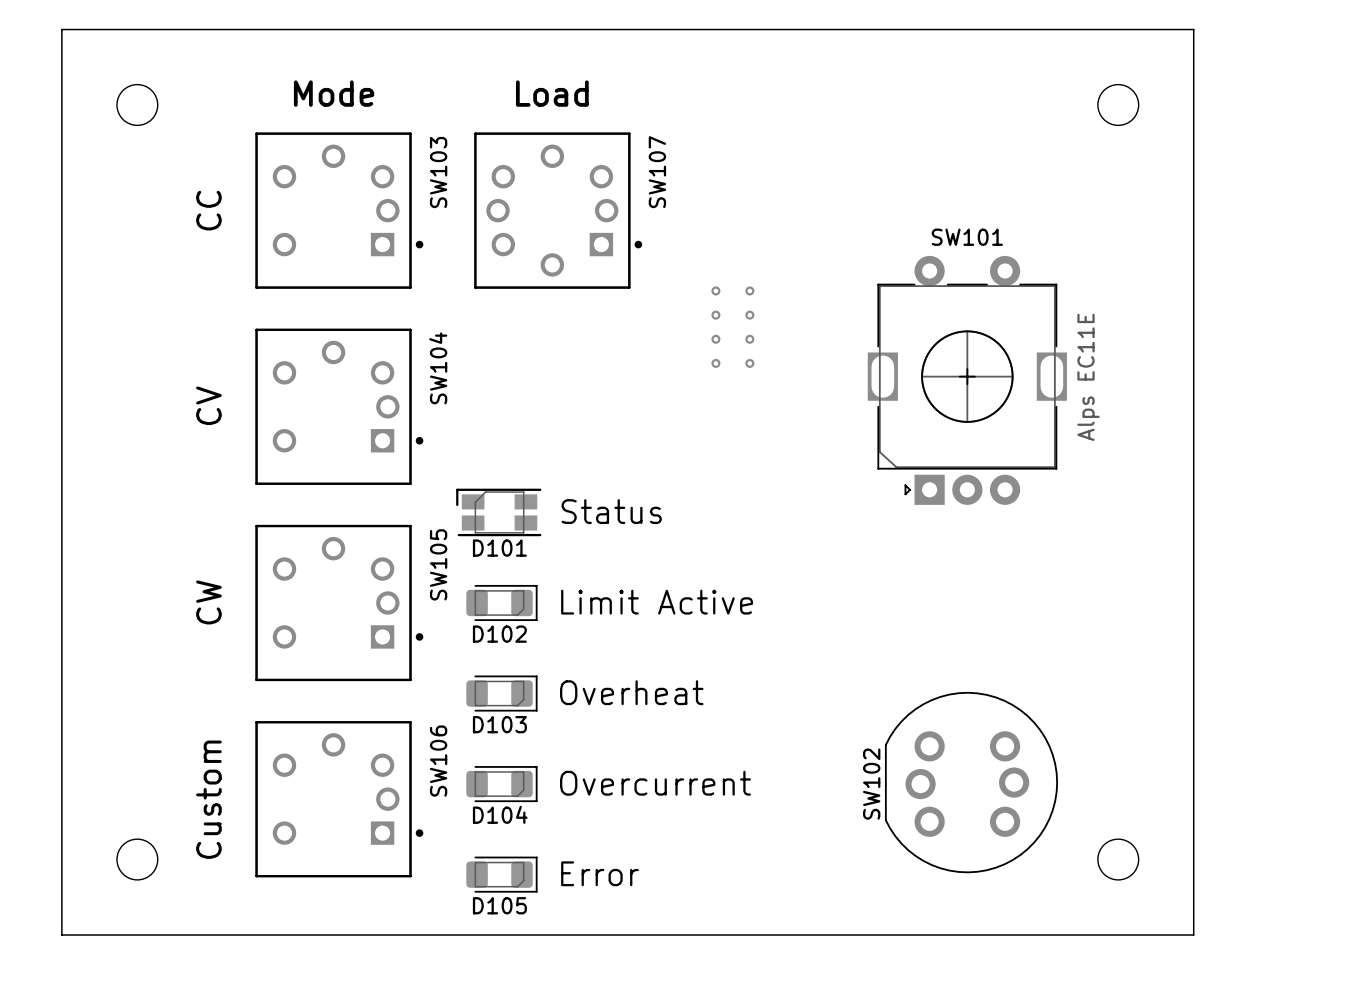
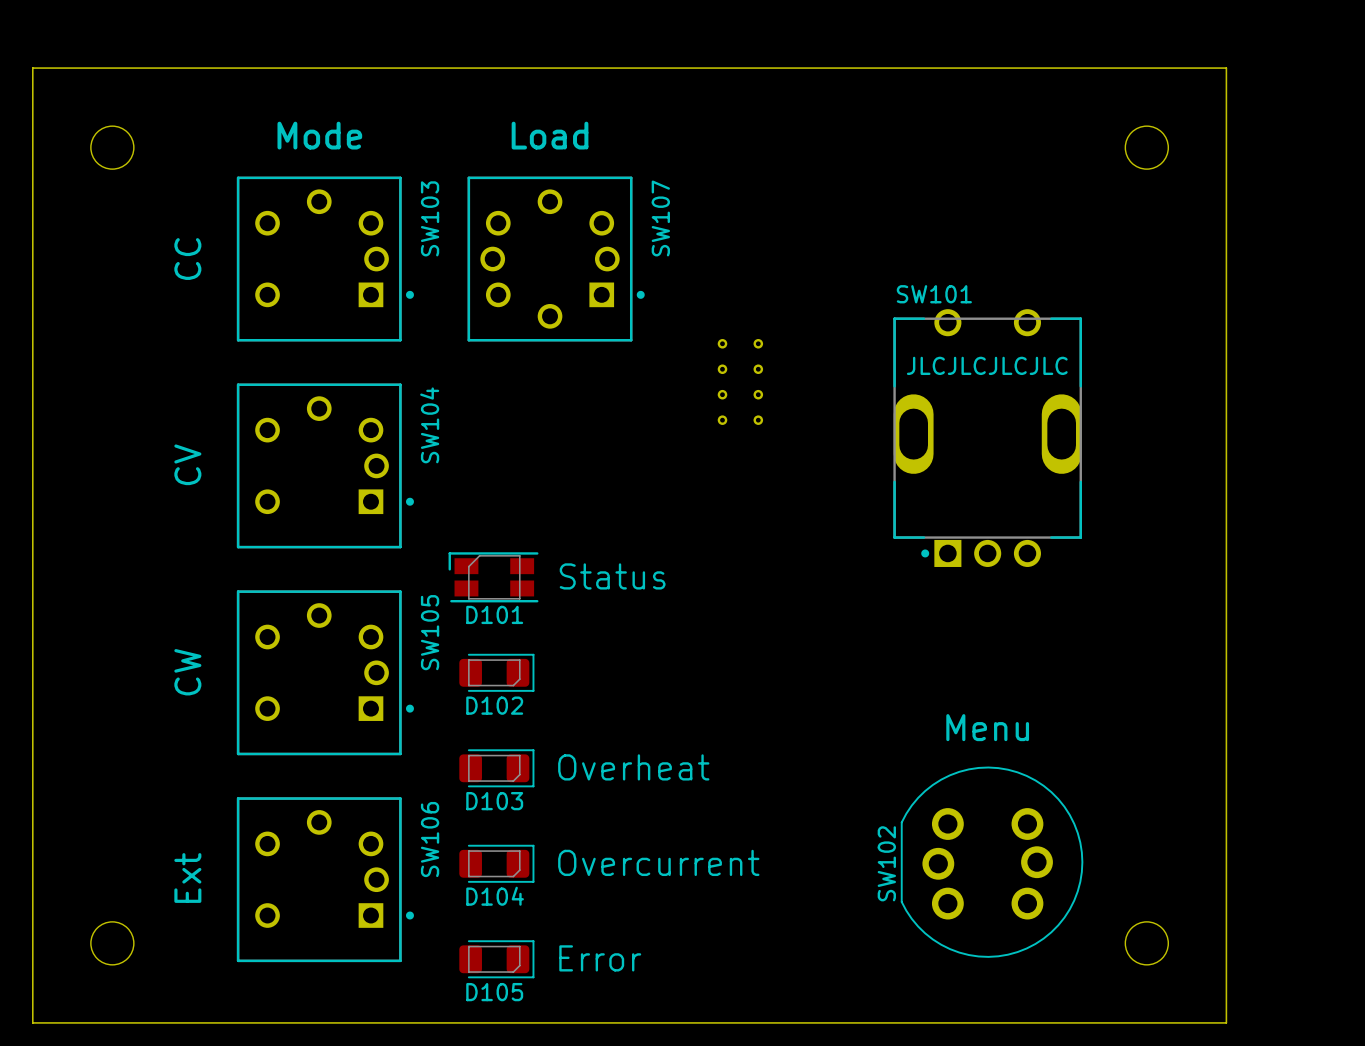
SW101 name position: SW101 (967, 237) -> SW101 (934, 294)
SW101 footprint: [867, 255, 1067, 505] -> [893, 309, 1082, 567]
text: none -> JLCJLCJLCJLC (987, 365)
SW101 value: Alps EC11E (1088, 377) -> none
text: Limit Active (657, 602) -> none
text: none -> Menu (987, 727)
text: Custom (208, 799) -> Ext (187, 878)

